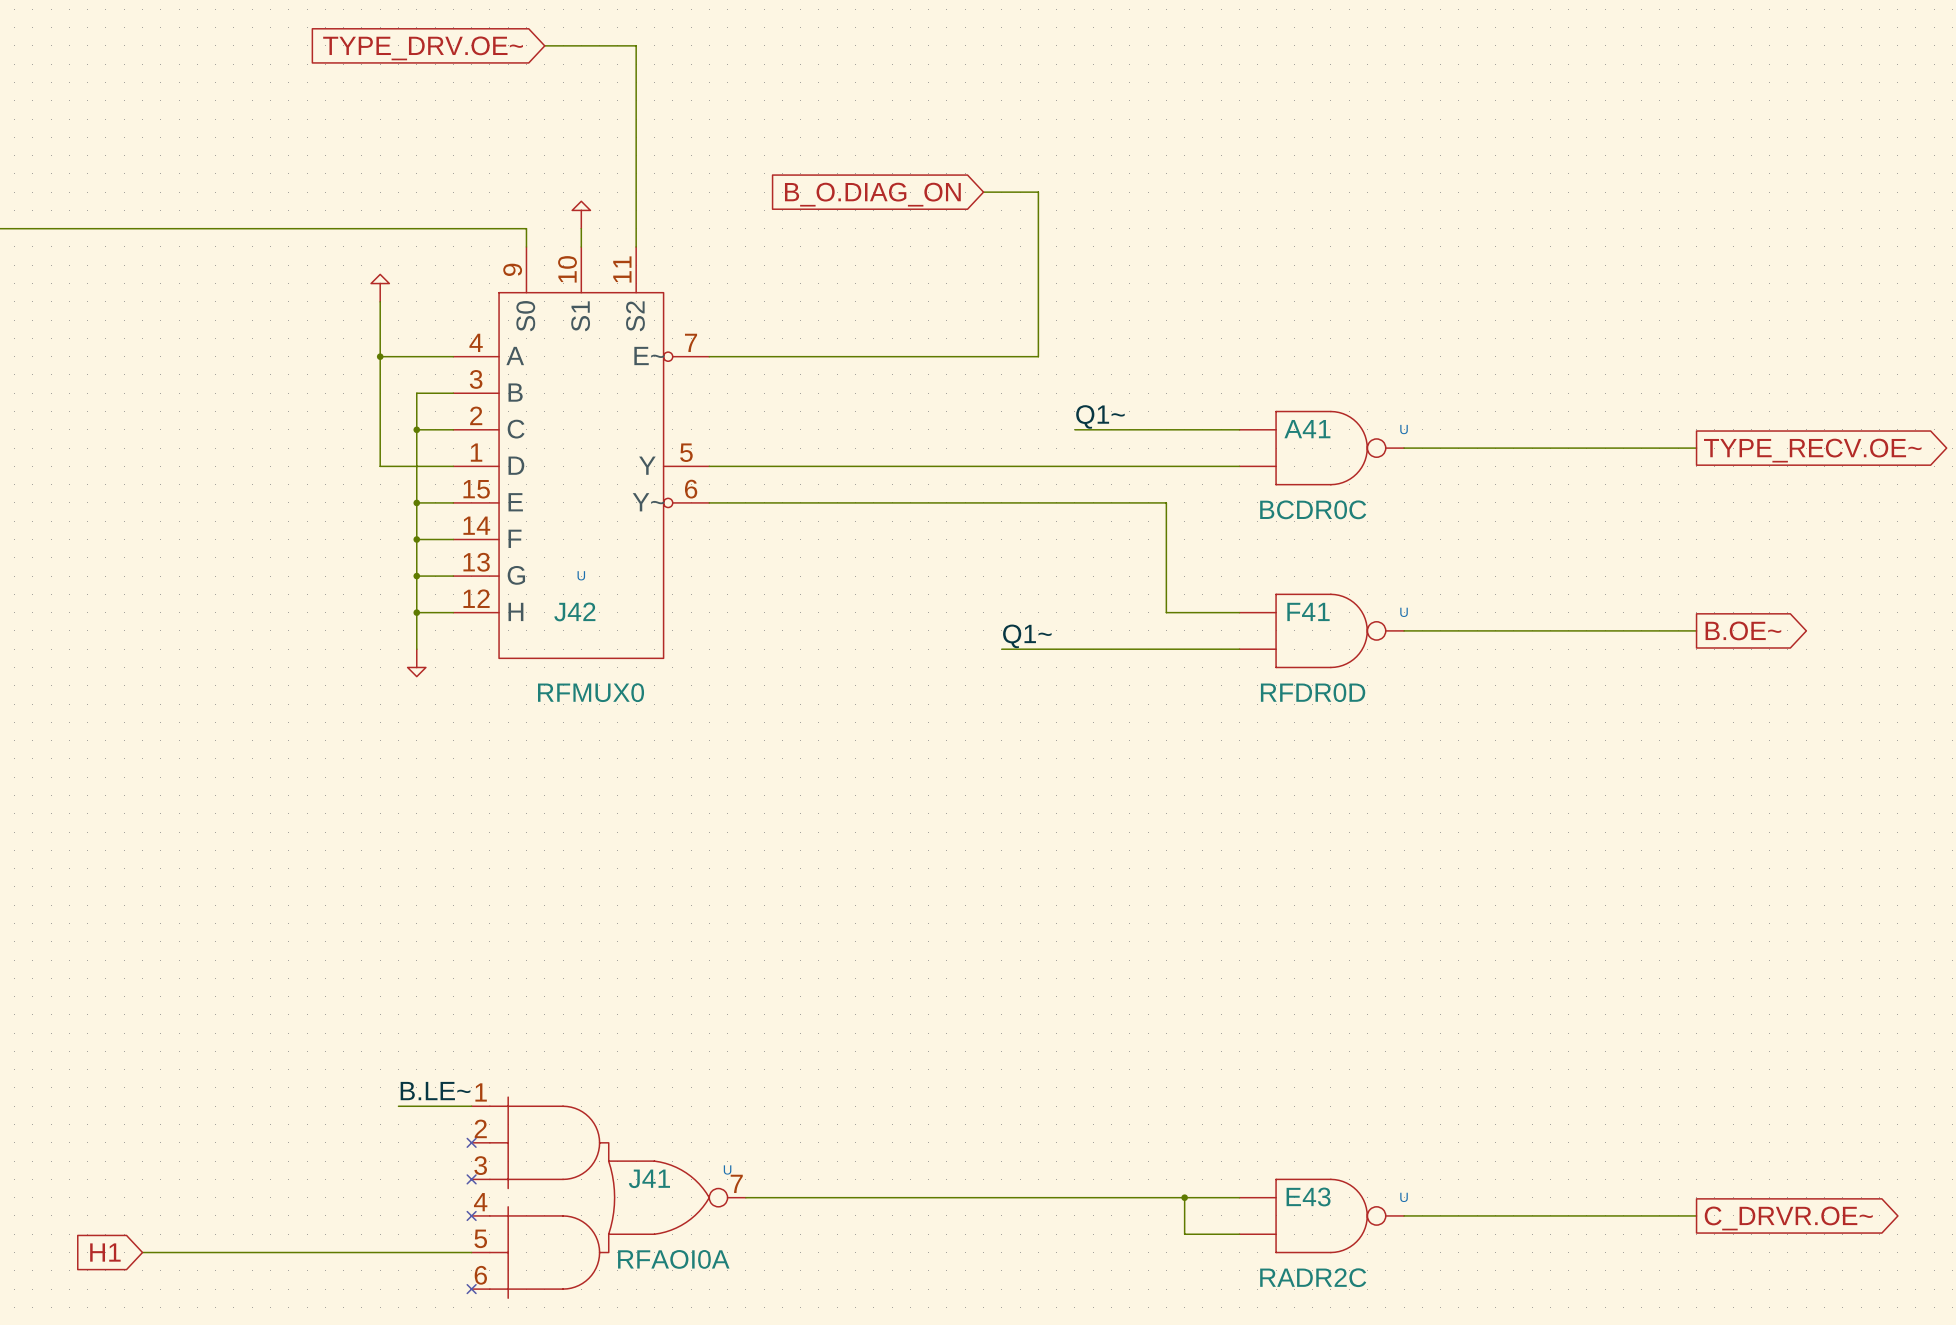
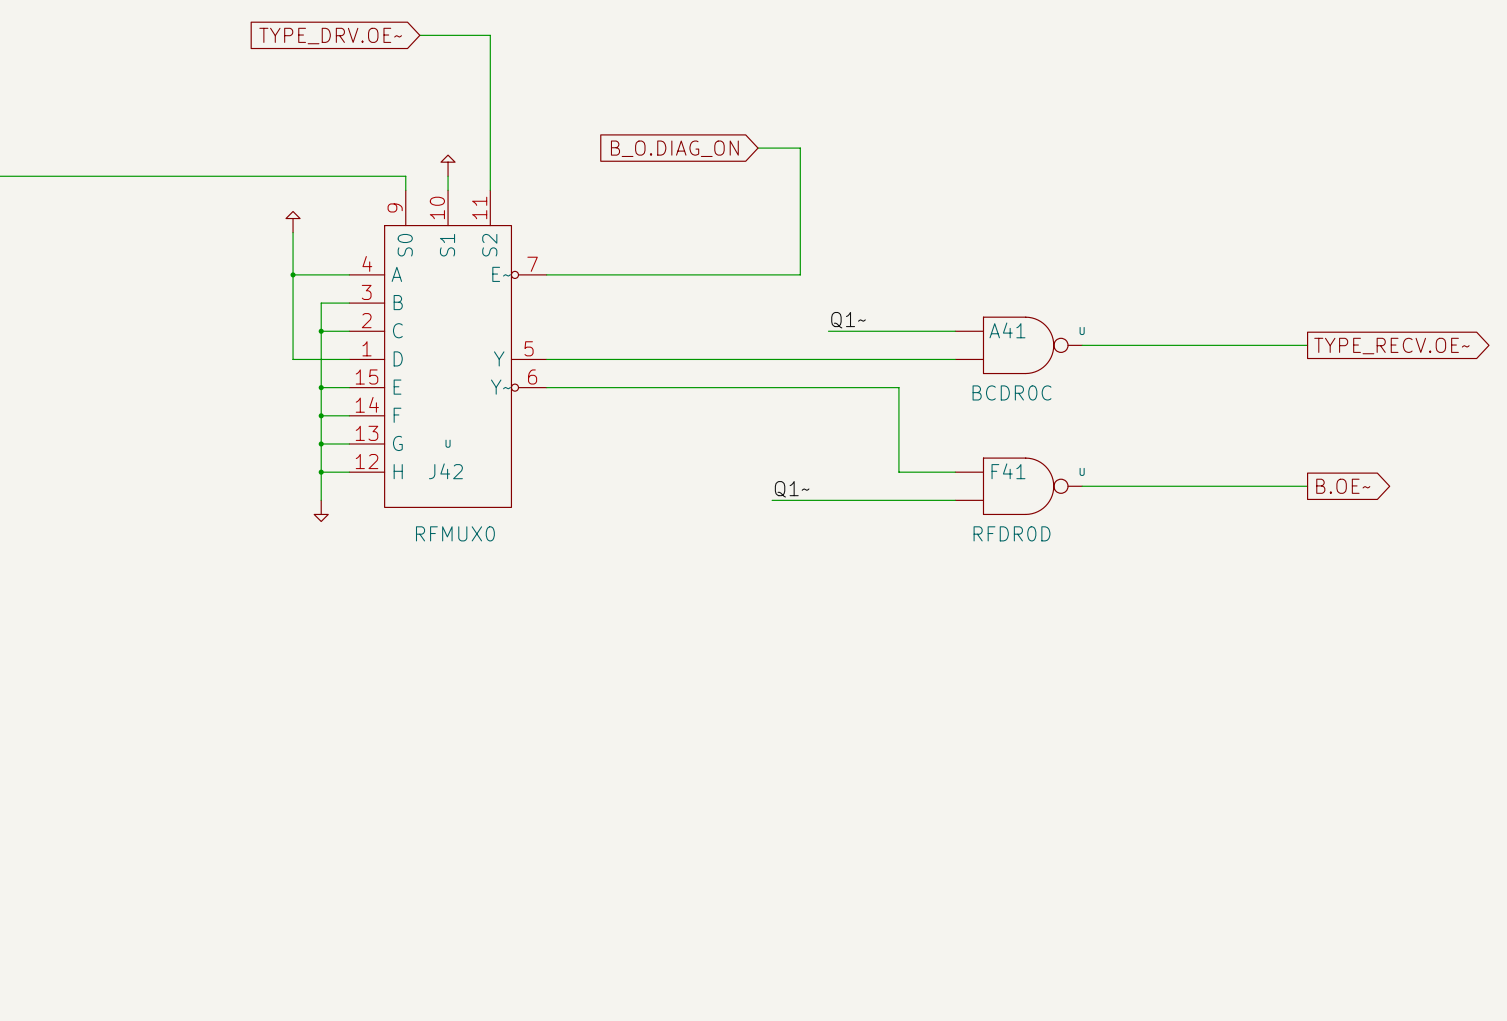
label: B.LE~ (435, 1091) -> none
wire: (398, 1106) (471, 1106) -> none
no-connect mark: (471, 1142) -> none
no-connect mark: (471, 1179) -> none
U: (608, 1197) -> none
wire: (745, 1197) (1239, 1197) -> none
wire: (1184, 1197) (1184, 1234) (1239, 1234) -> none
junction: (1184, 1197) -> none
no-connect mark: (471, 1215) -> none
U: (1321, 1215) -> none
wire: (1404, 1215) (1696, 1215) -> none
global label: C_DRVR.OE~ (1788, 1218) -> none
global label: H1 (105, 1252) -> none
wire: (142, 1252) (471, 1252) -> none
no-connect mark: (471, 1289) -> none

